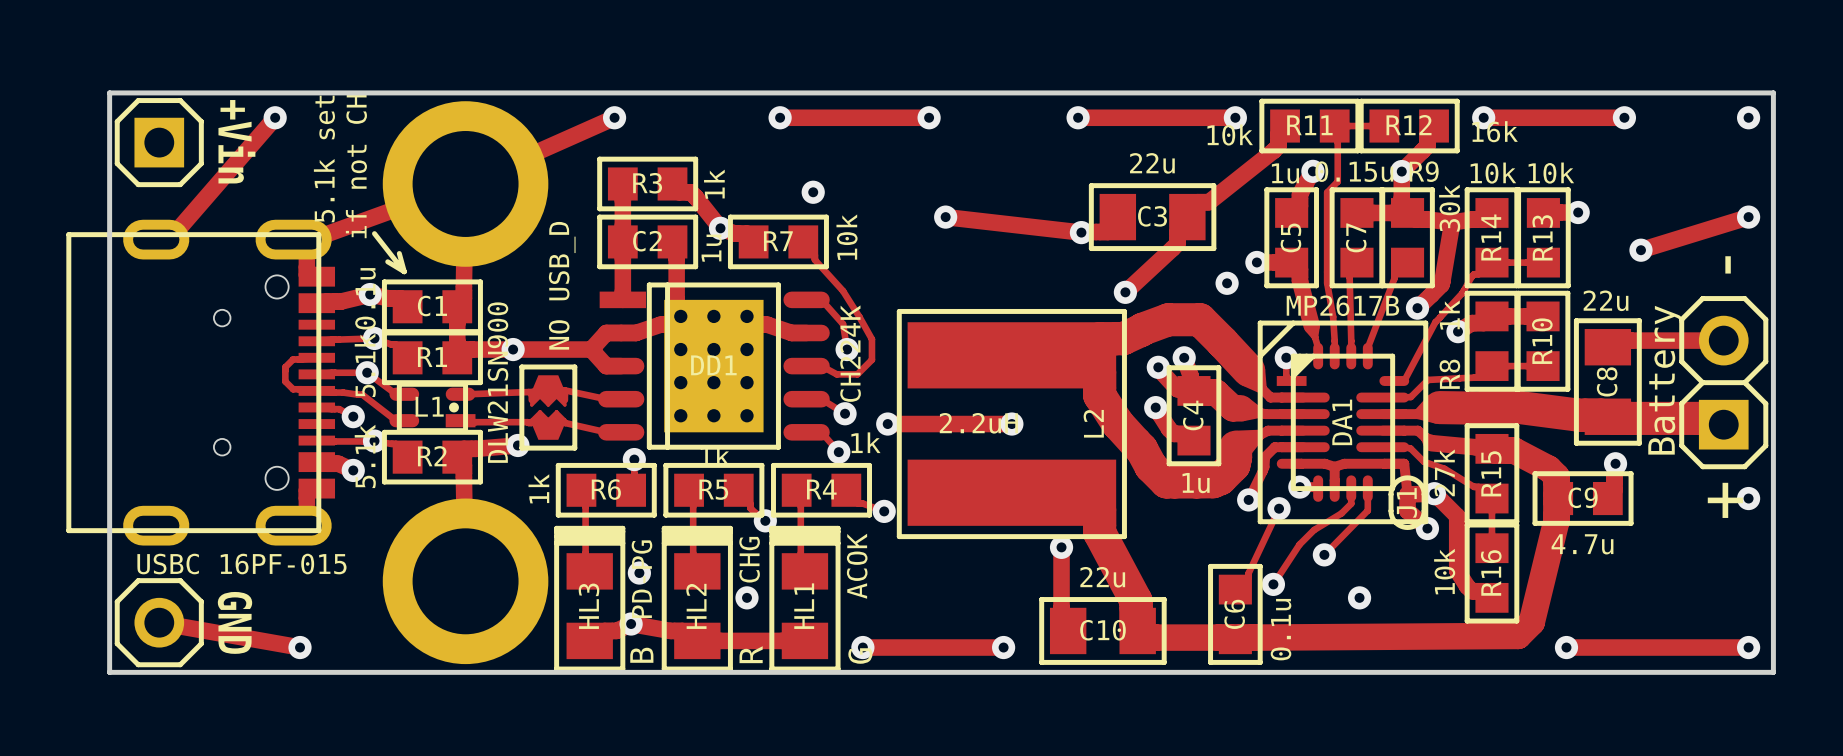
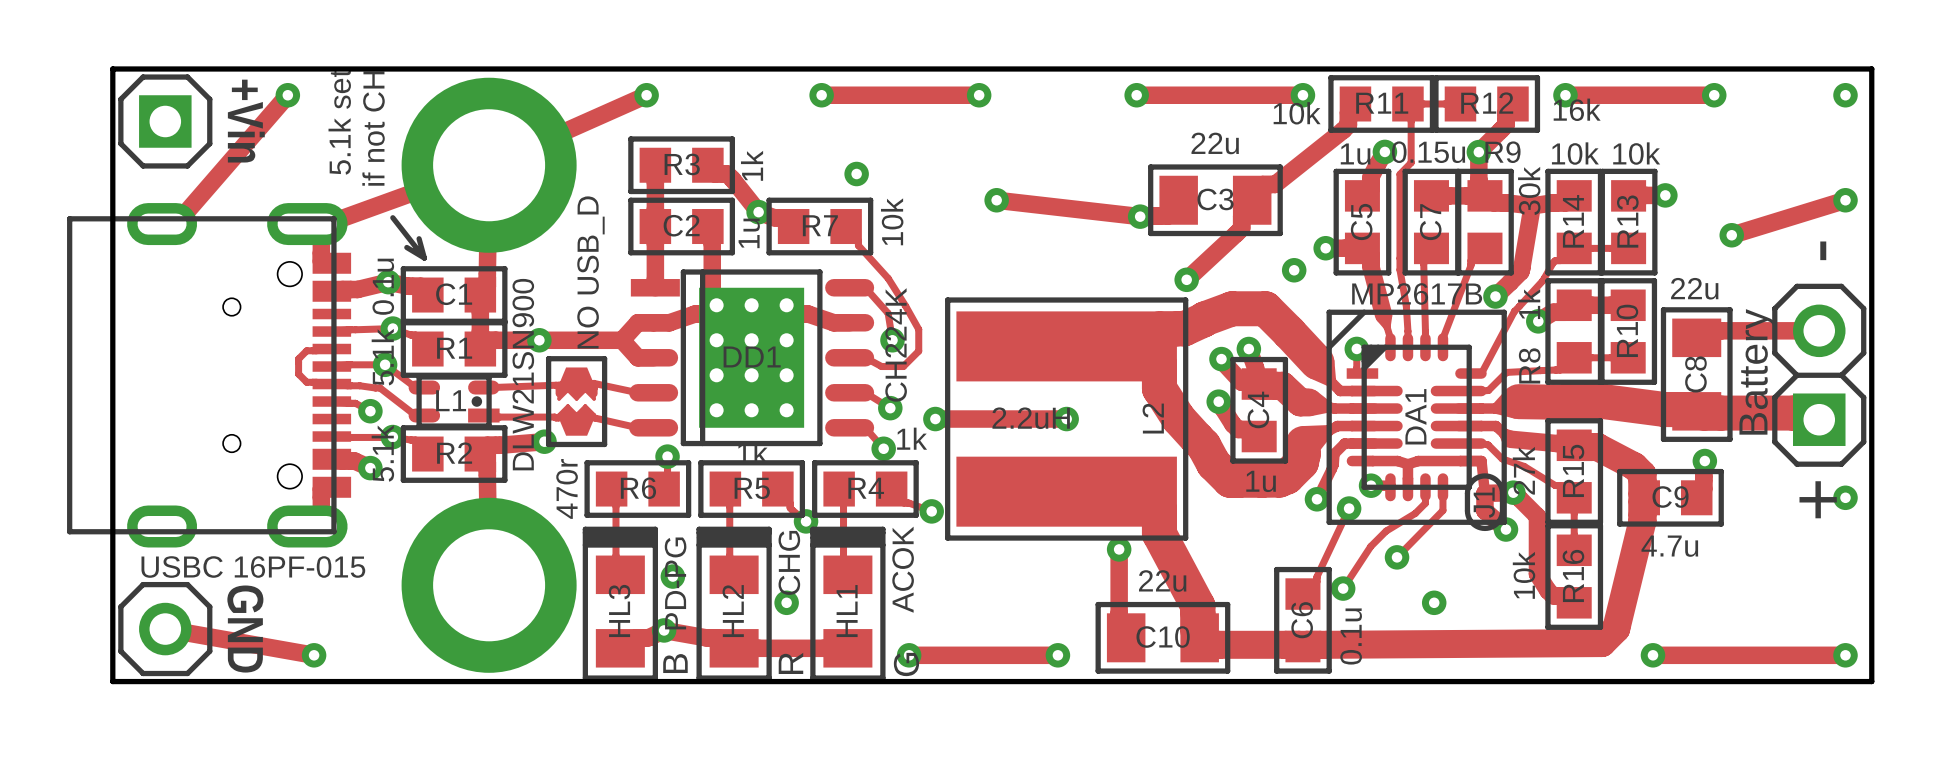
R6 value: 1k (538, 488) -> 470r (567, 488)

